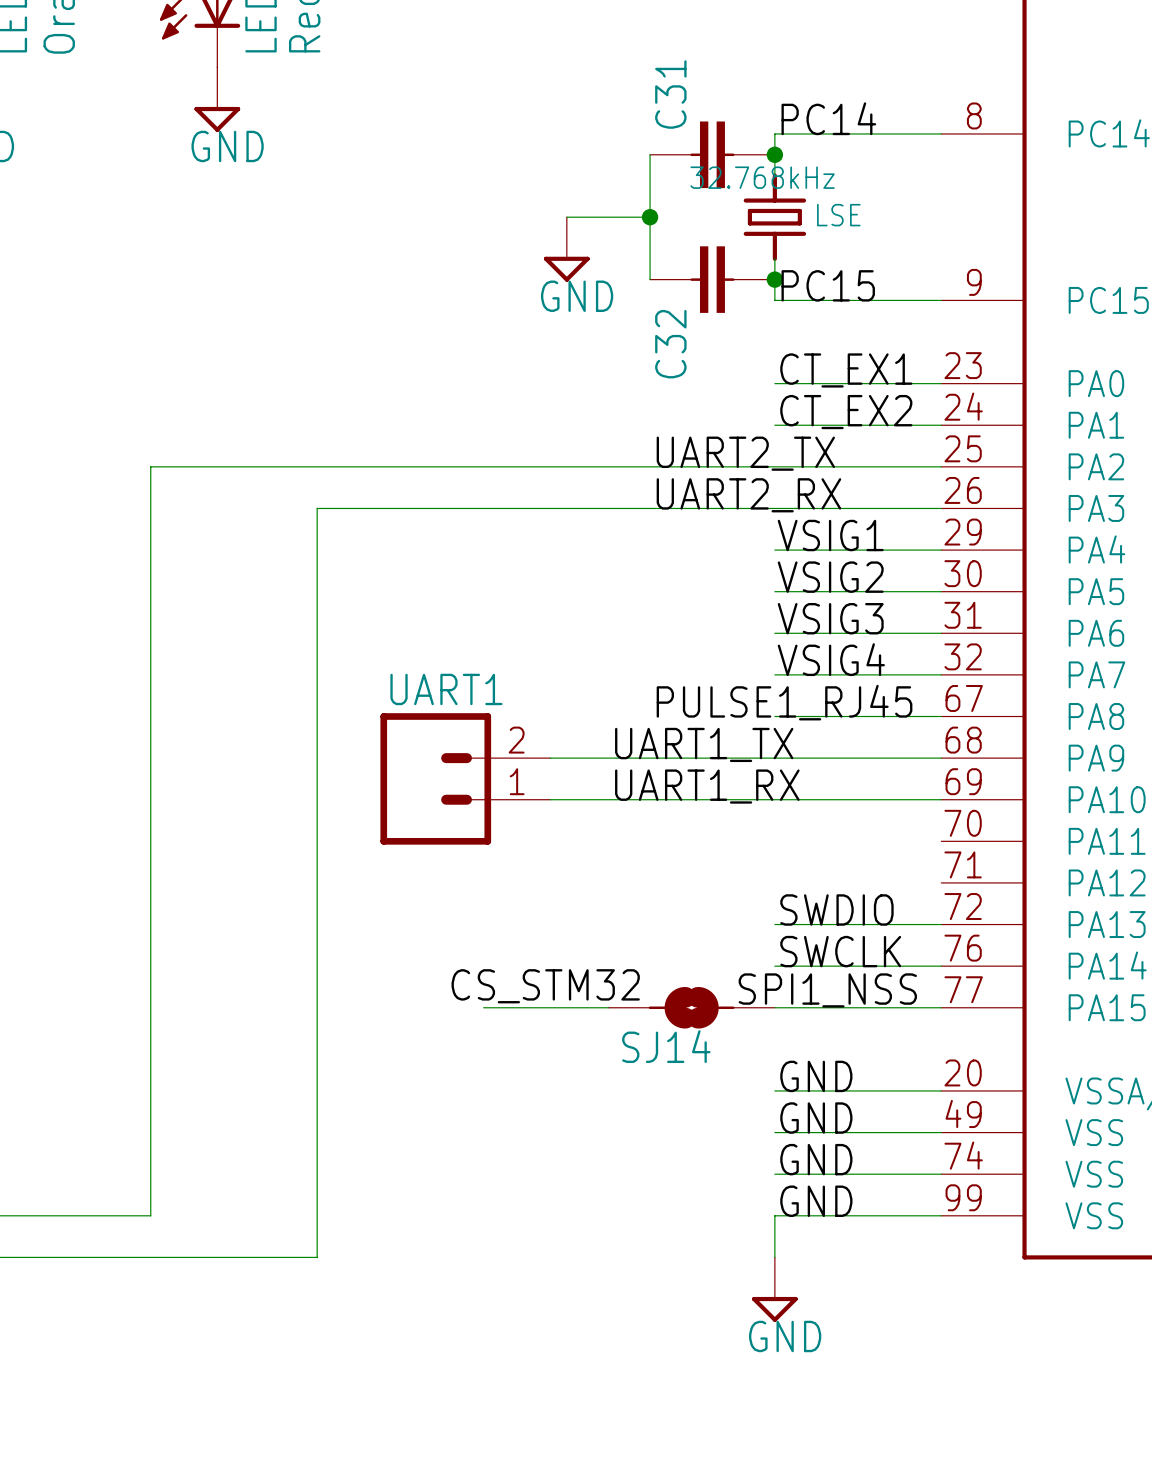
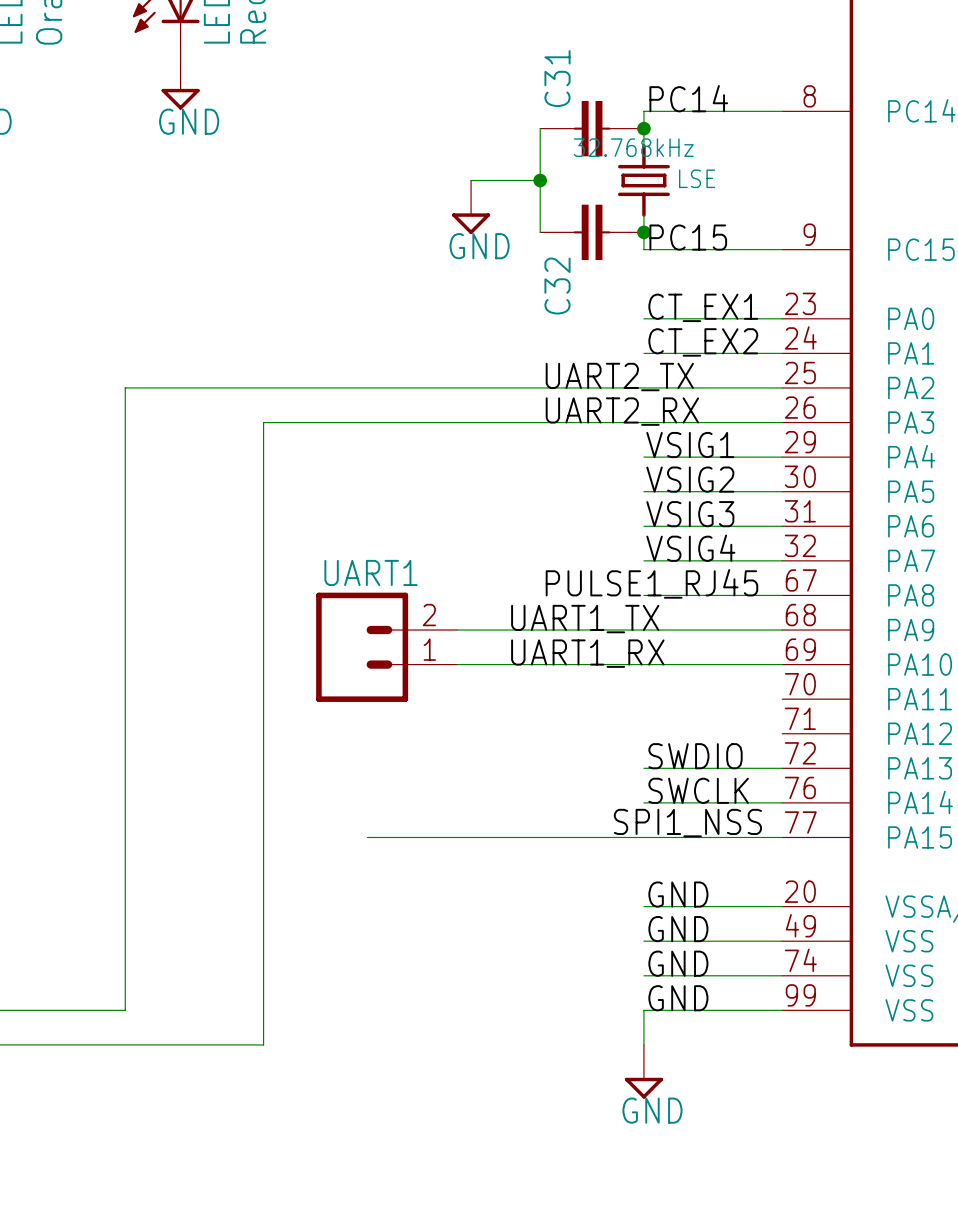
label: CS_STM32 (545, 986) -> none
wire: none -> (367, 837) (401, 837)
SJ14: (691, 1007) -> none

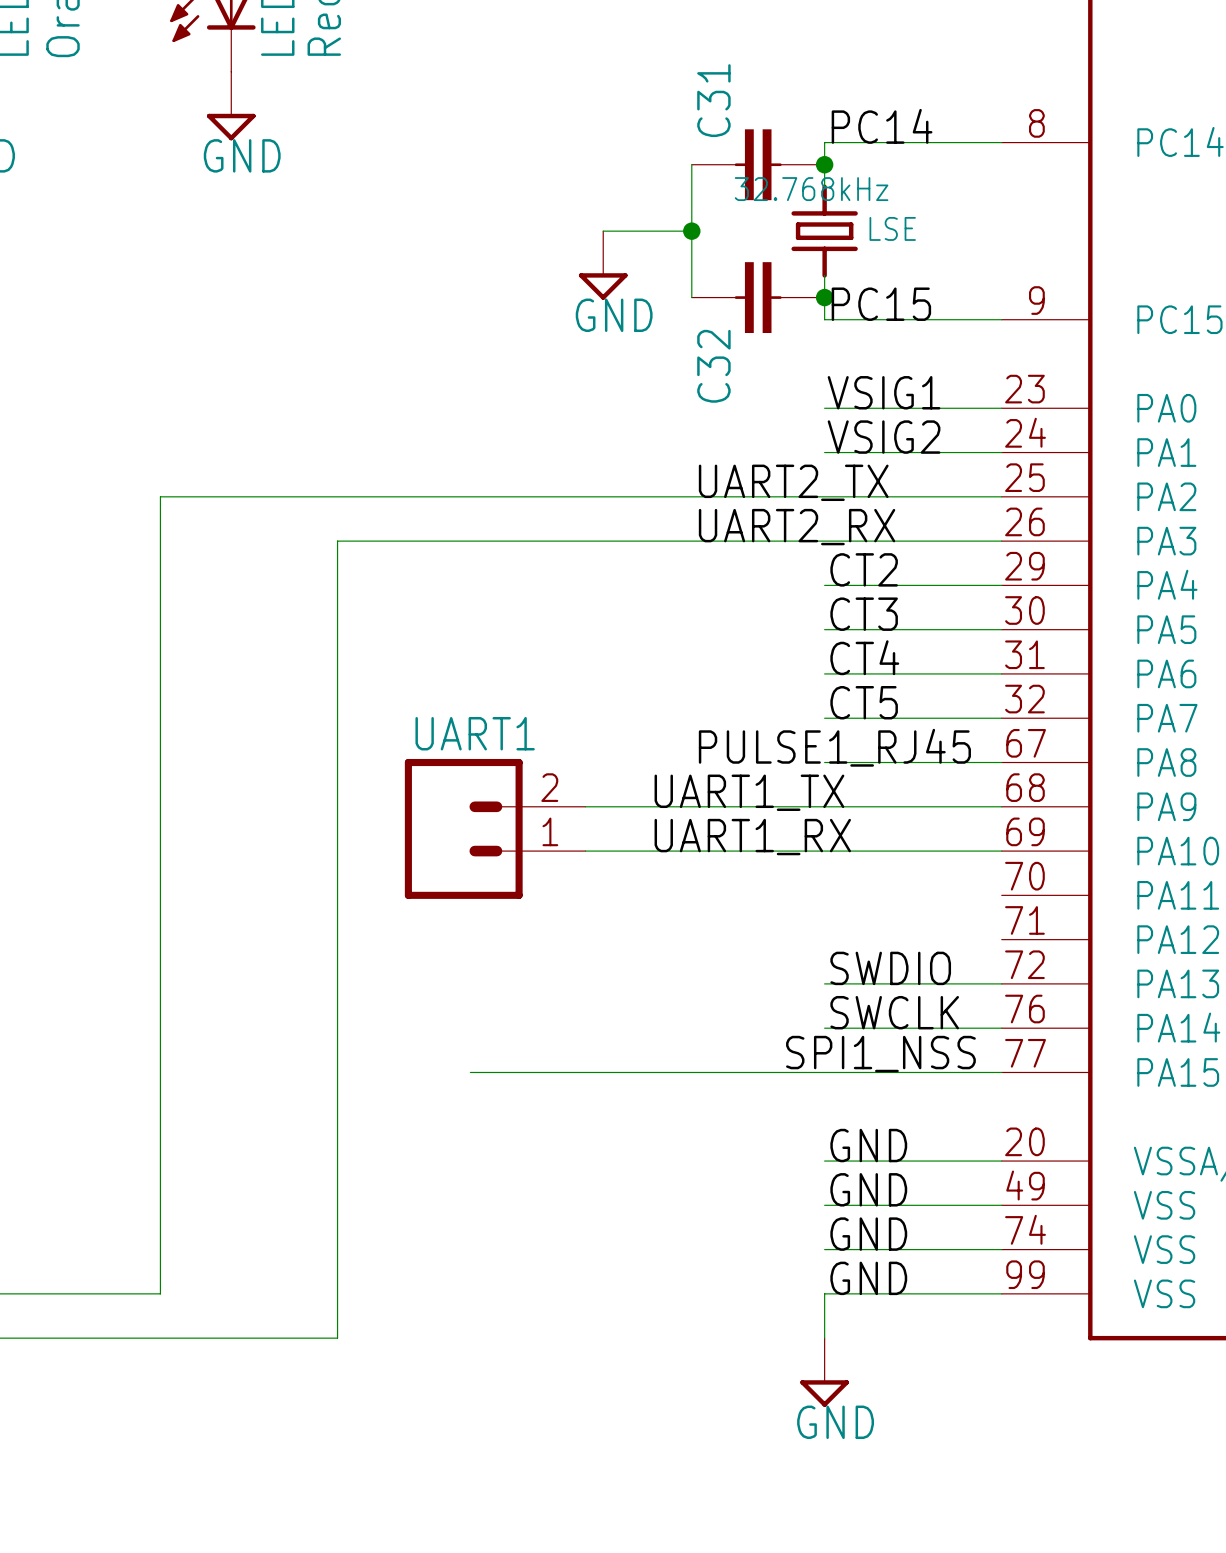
label: CT_EX1 (703, 307) -> VSIG1 (884, 392)
label: CT_EX2 (703, 342) -> VSIG2 (884, 437)
label: VSIG1 (690, 445) -> CT2 (864, 569)
label: VSIG2 (690, 479) -> CT3 (864, 614)
label: VSIG3 (690, 514) -> CT4 (864, 657)
label: VSIG4 (690, 548) -> CT5 (864, 702)

